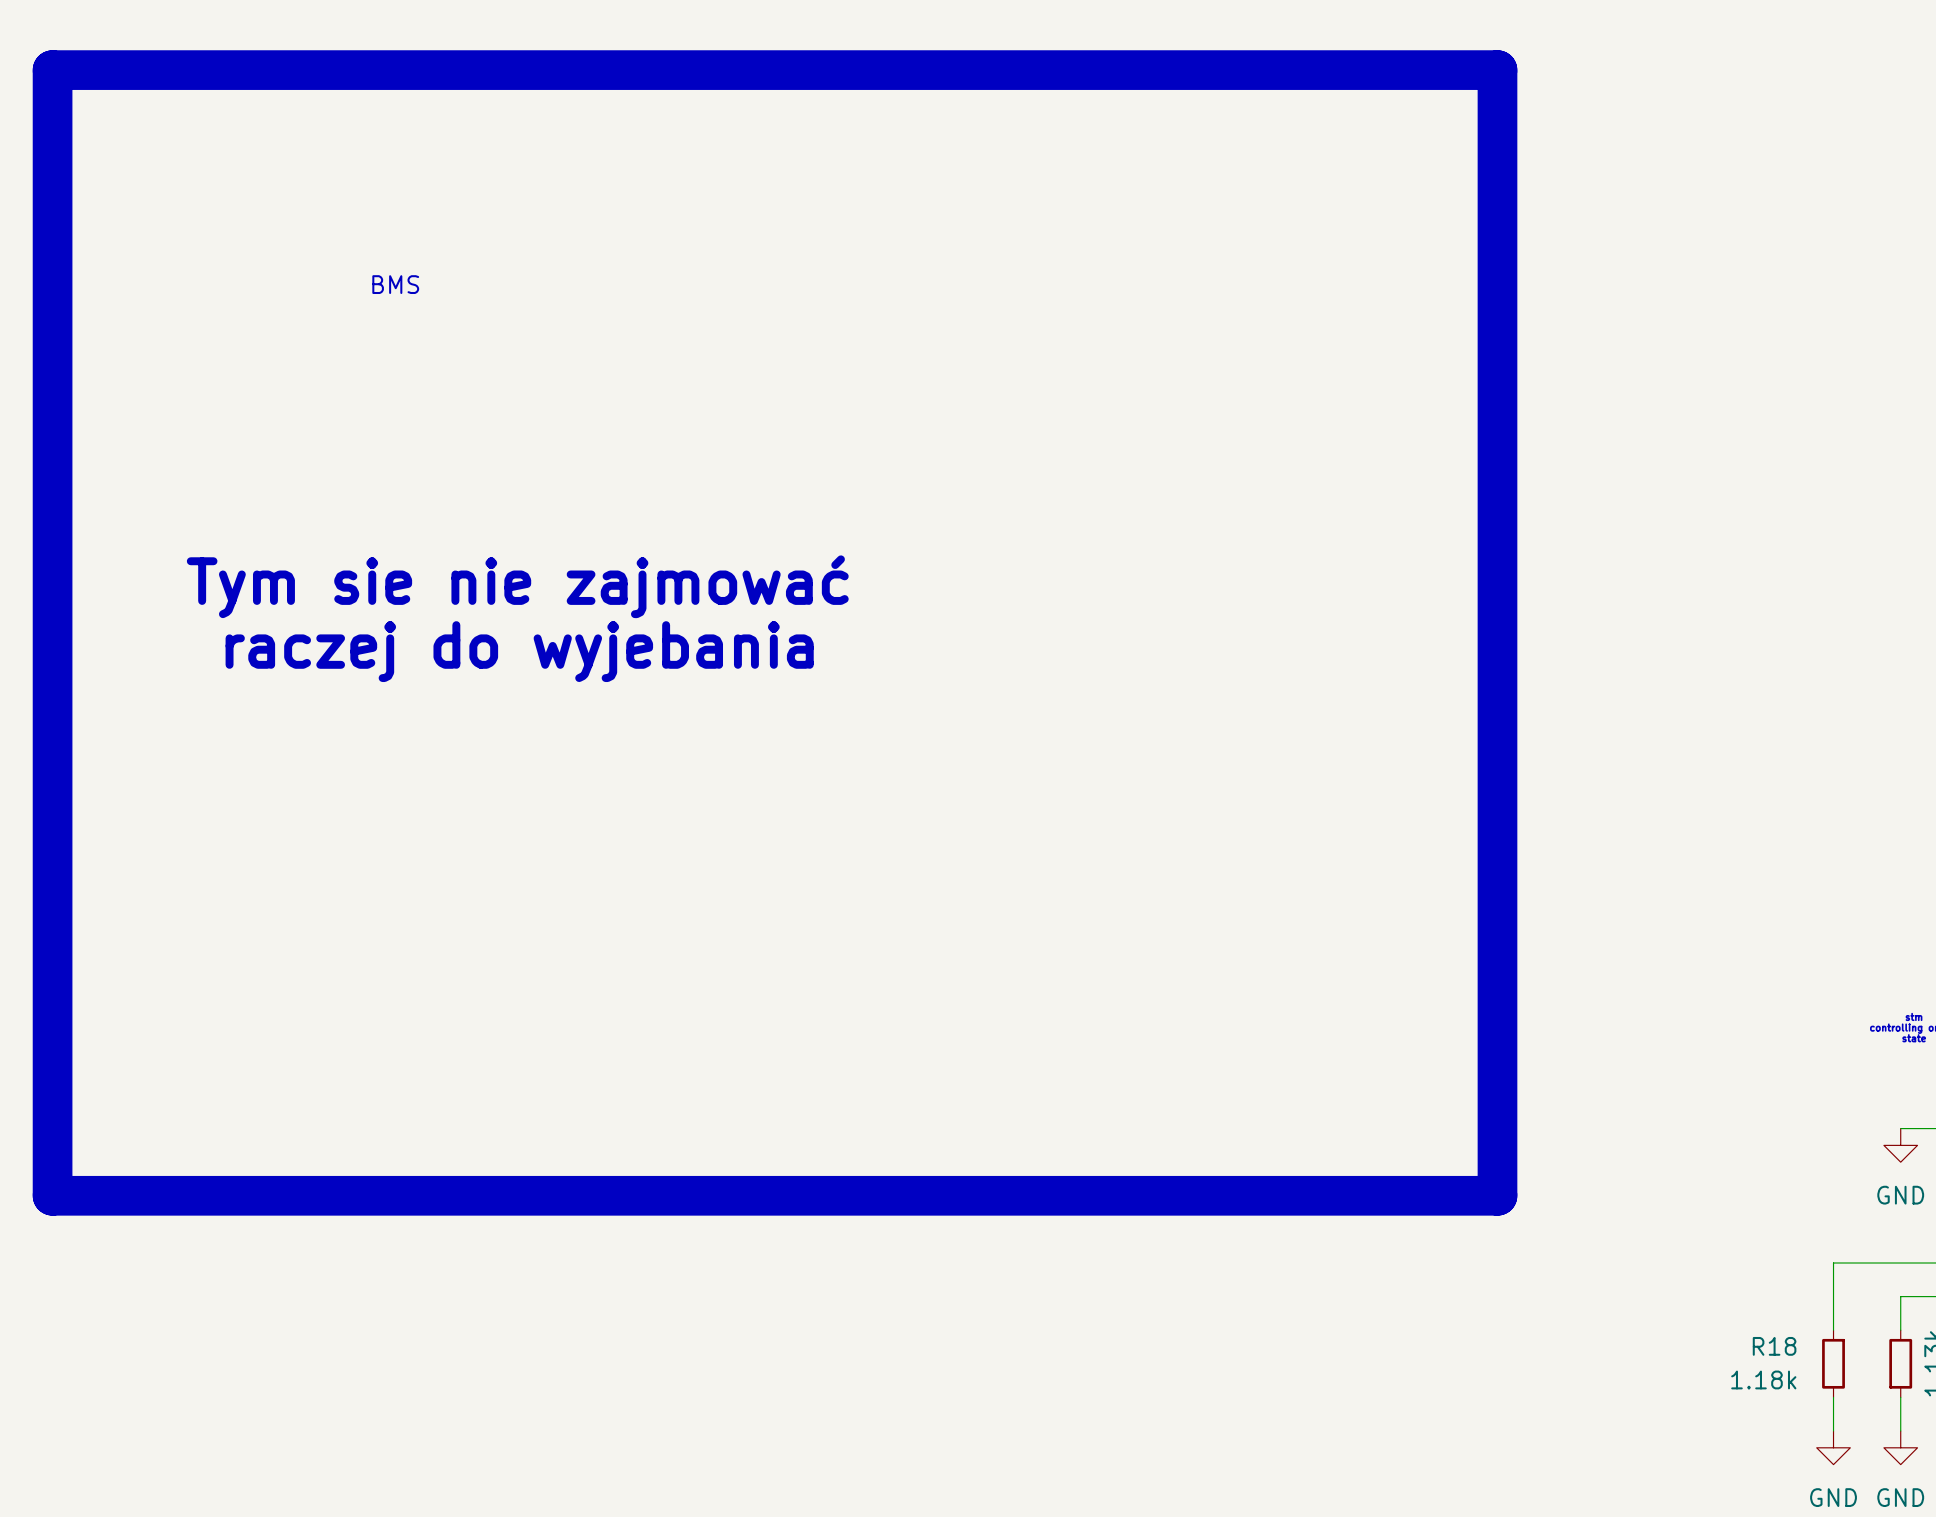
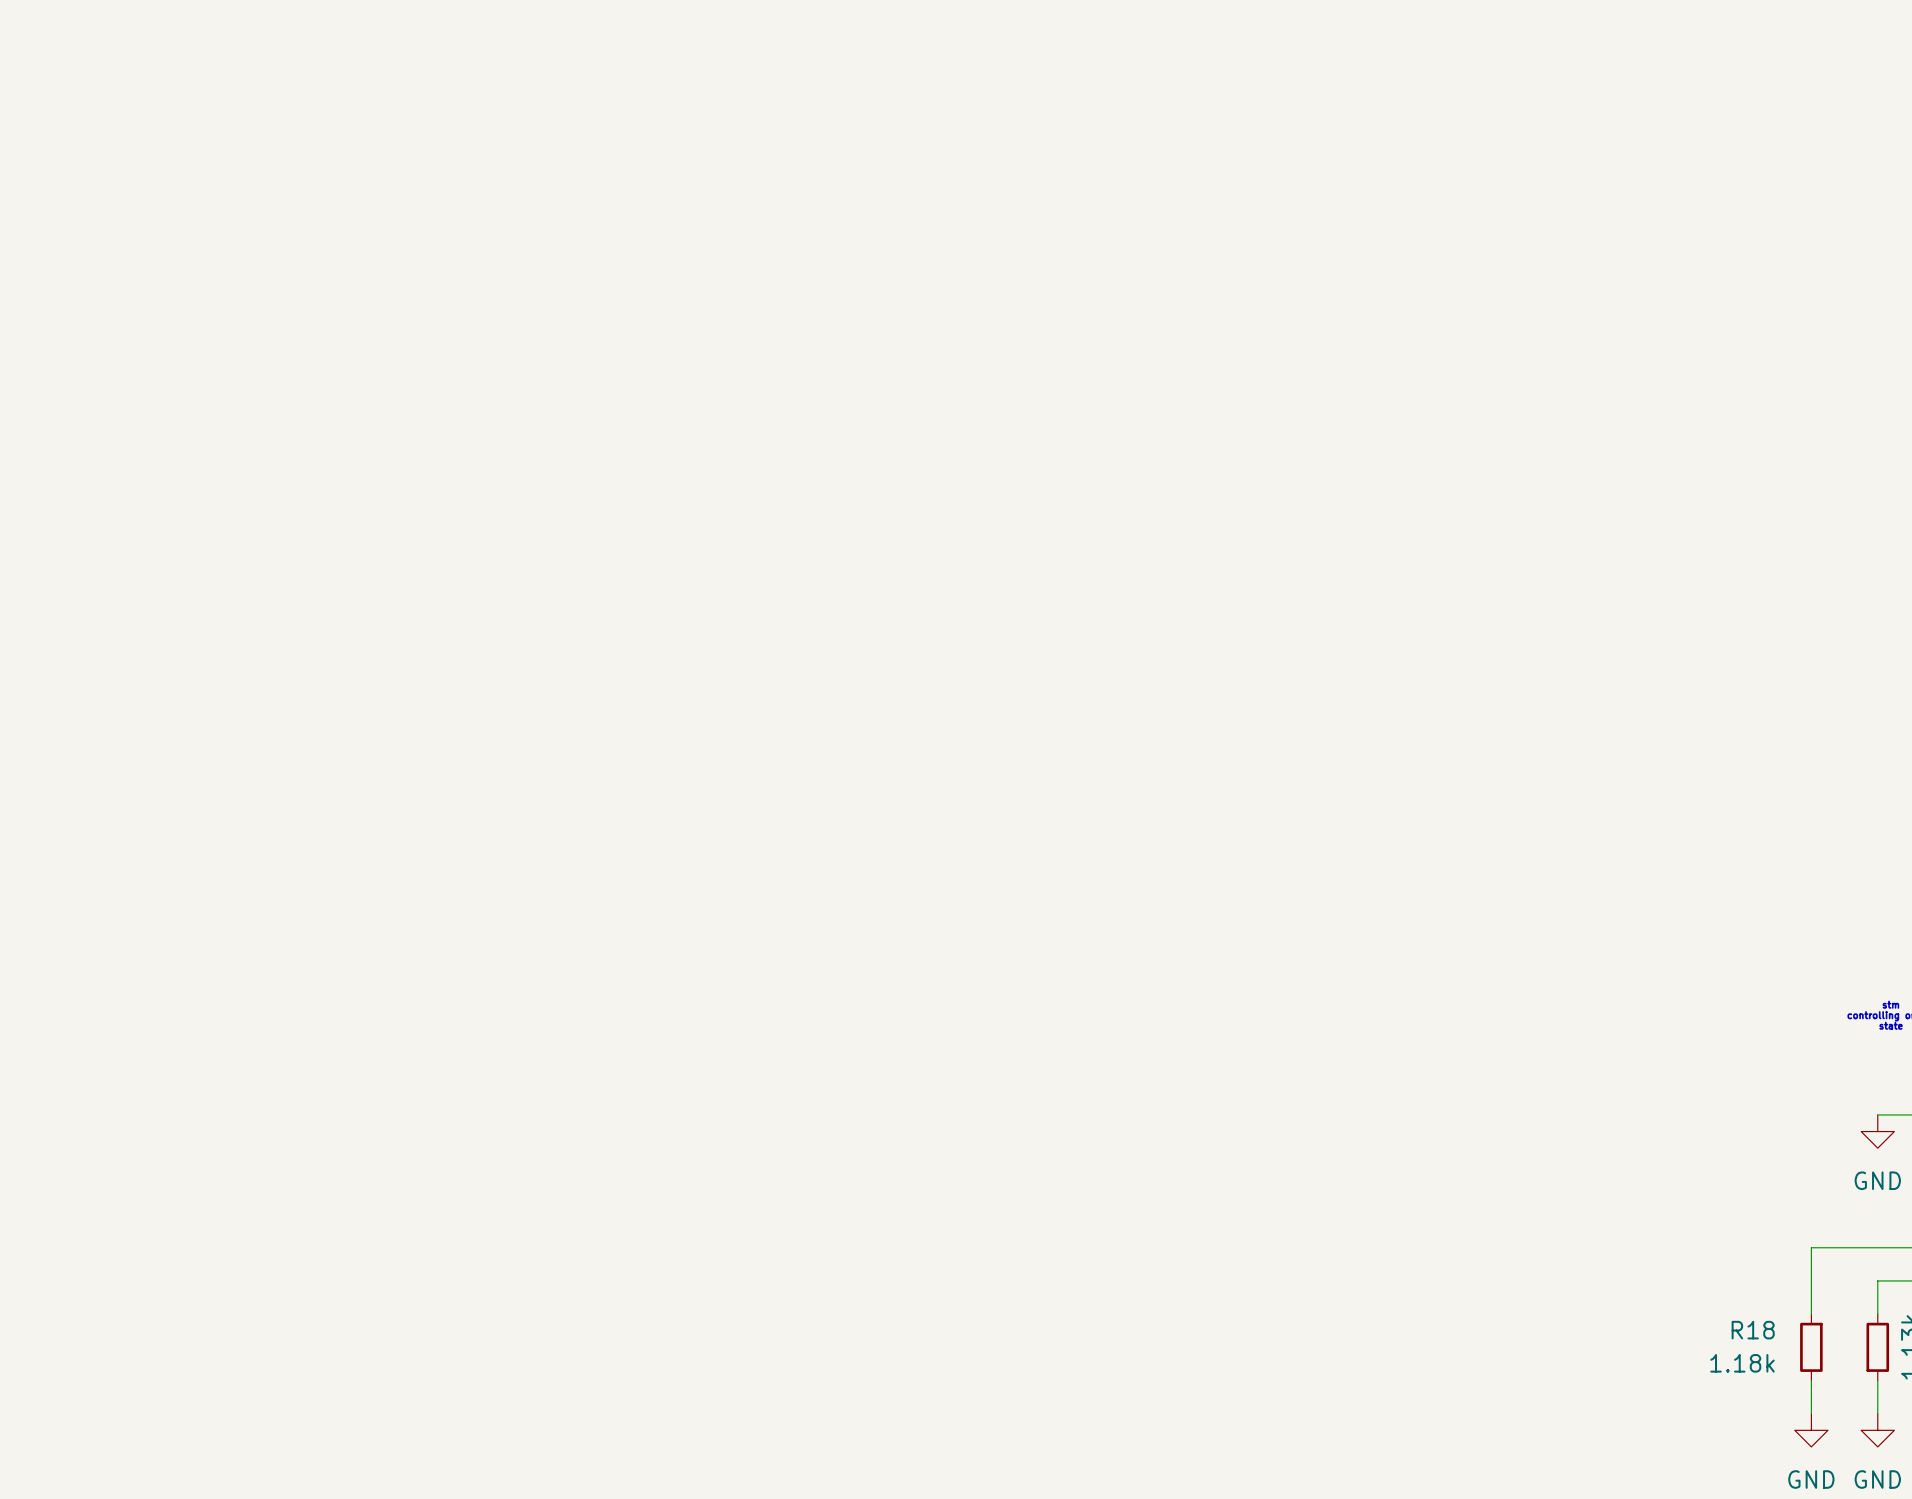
line: (52, 70) (1497, 70) (1497, 1195) (52, 1195) (52, 70) -> none
text: BMS (395, 284) -> none
text: Tym sie nie zajmować (517, 586) -> none
text: raczej do wyjebania (519, 651) -> none

